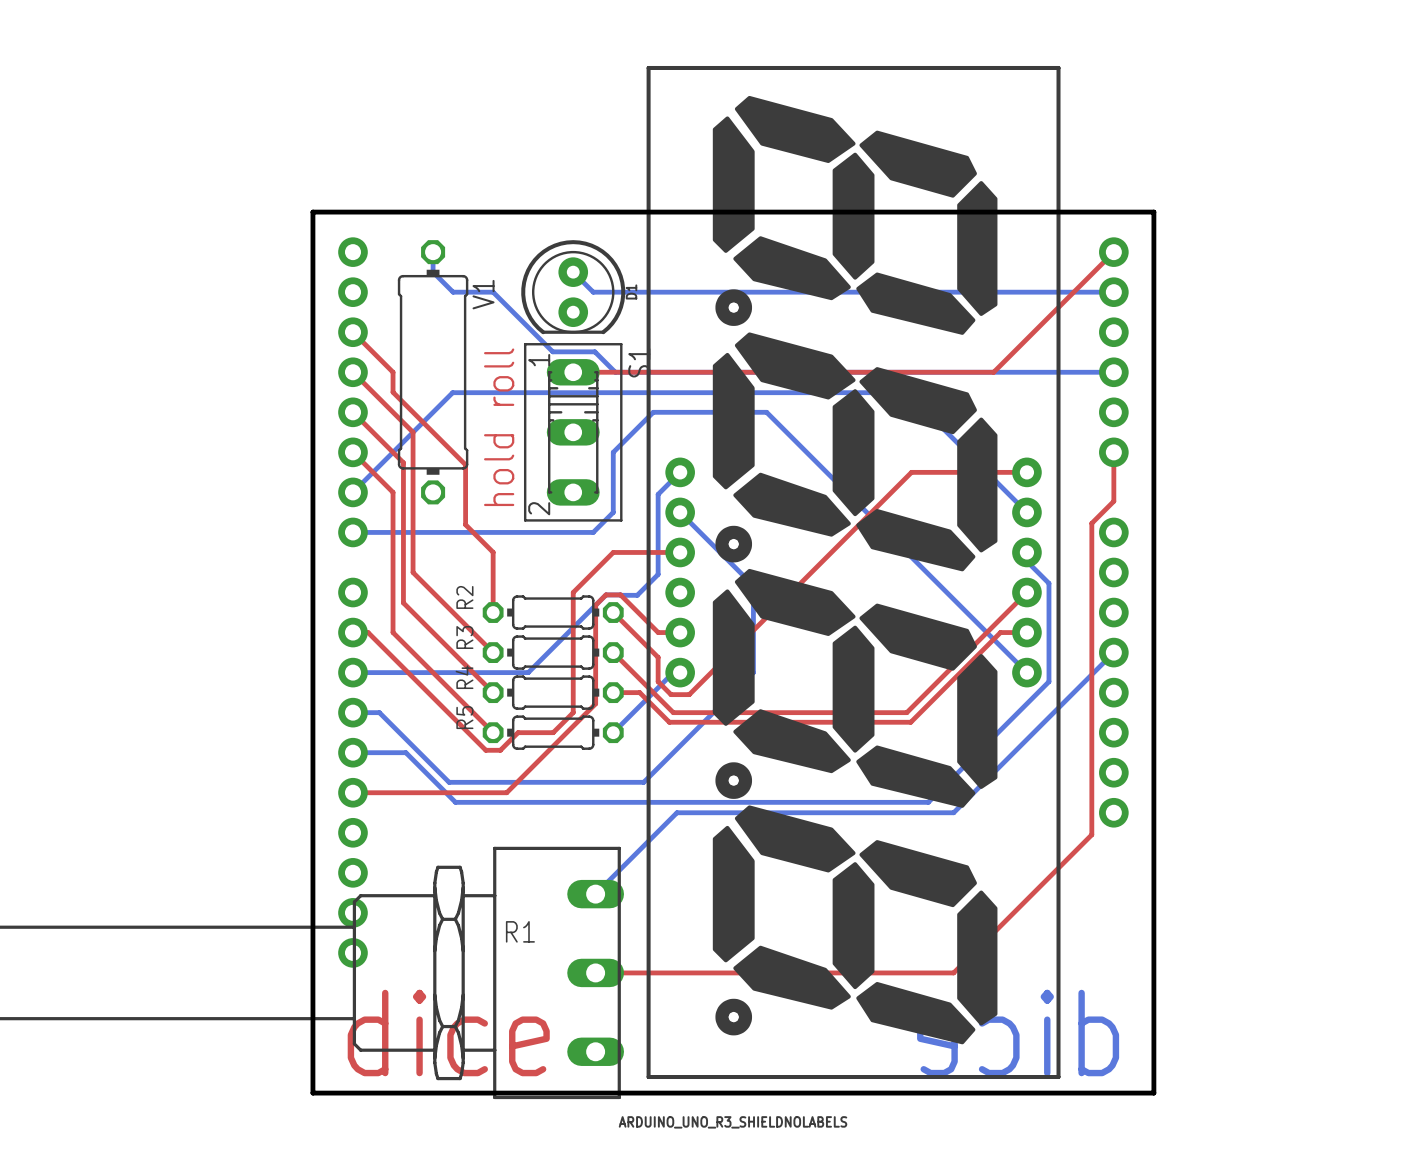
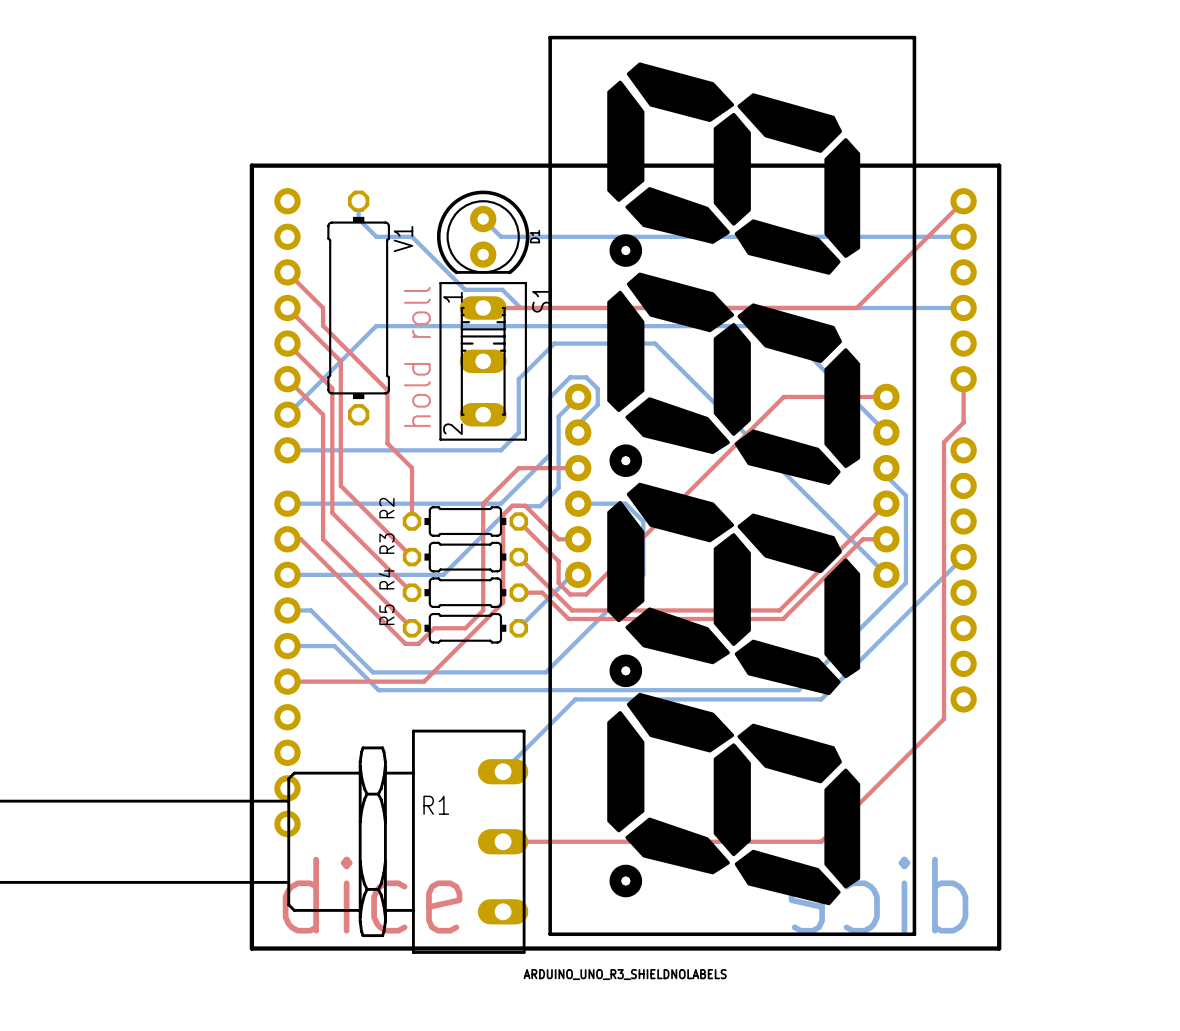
bottom track: (680, 512) (753, 585) (753, 612) -> (578, 503) (625, 503) (643, 521)
bottom track: none -> (578, 432) (578, 424) (597, 405) (597, 388) (586, 377) (570, 377) (550, 397) (550, 454) (500, 503) (287, 503)

